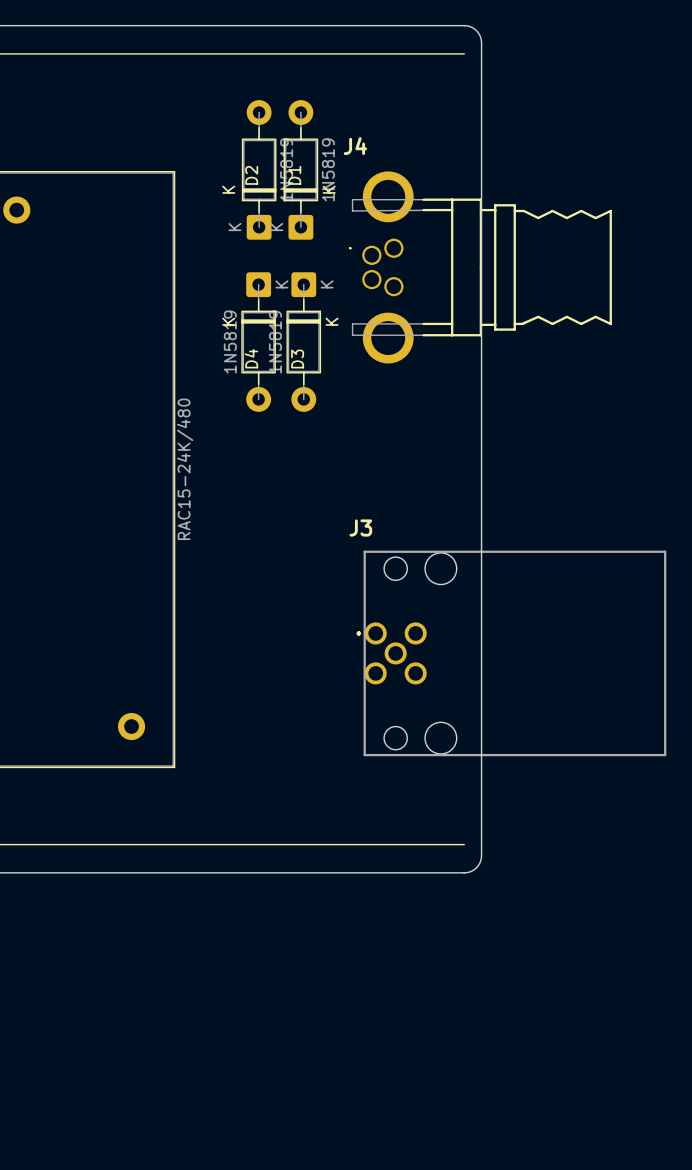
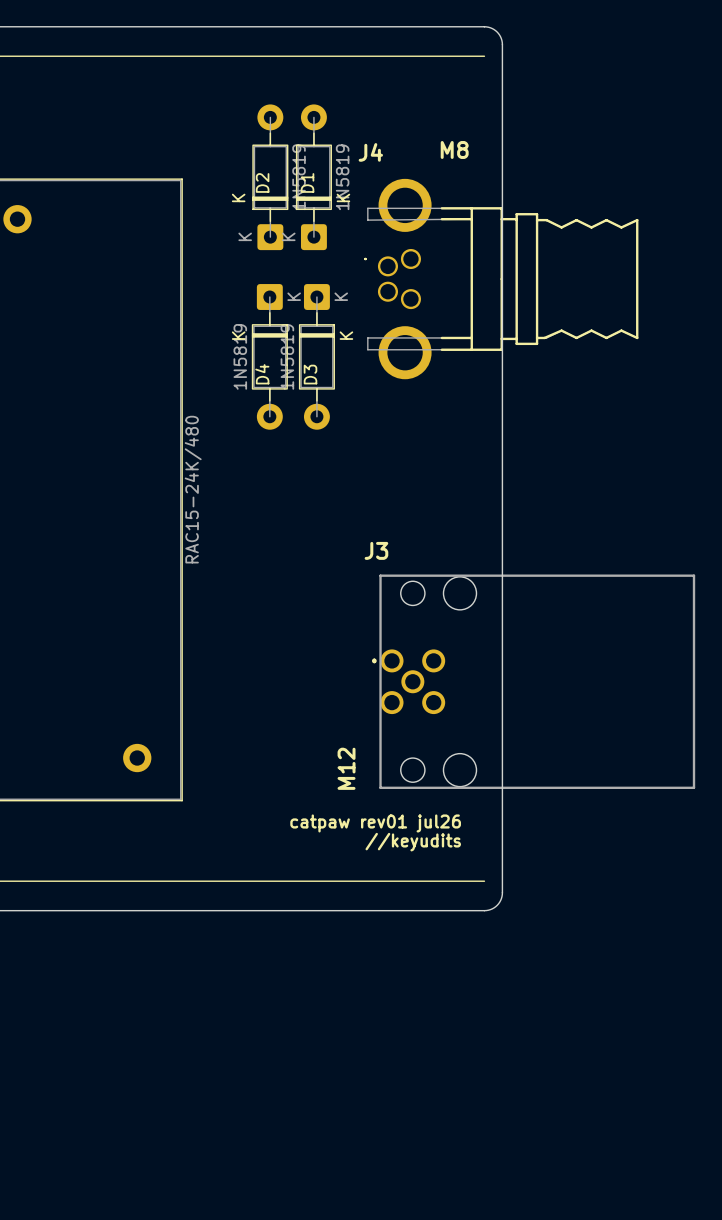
text: none -> M8 (454, 149)
text: none -> M12 (346, 768)
text: none -> catpaw rev01 jul26 (375, 823)
text: none -> //keyudits (413, 842)

